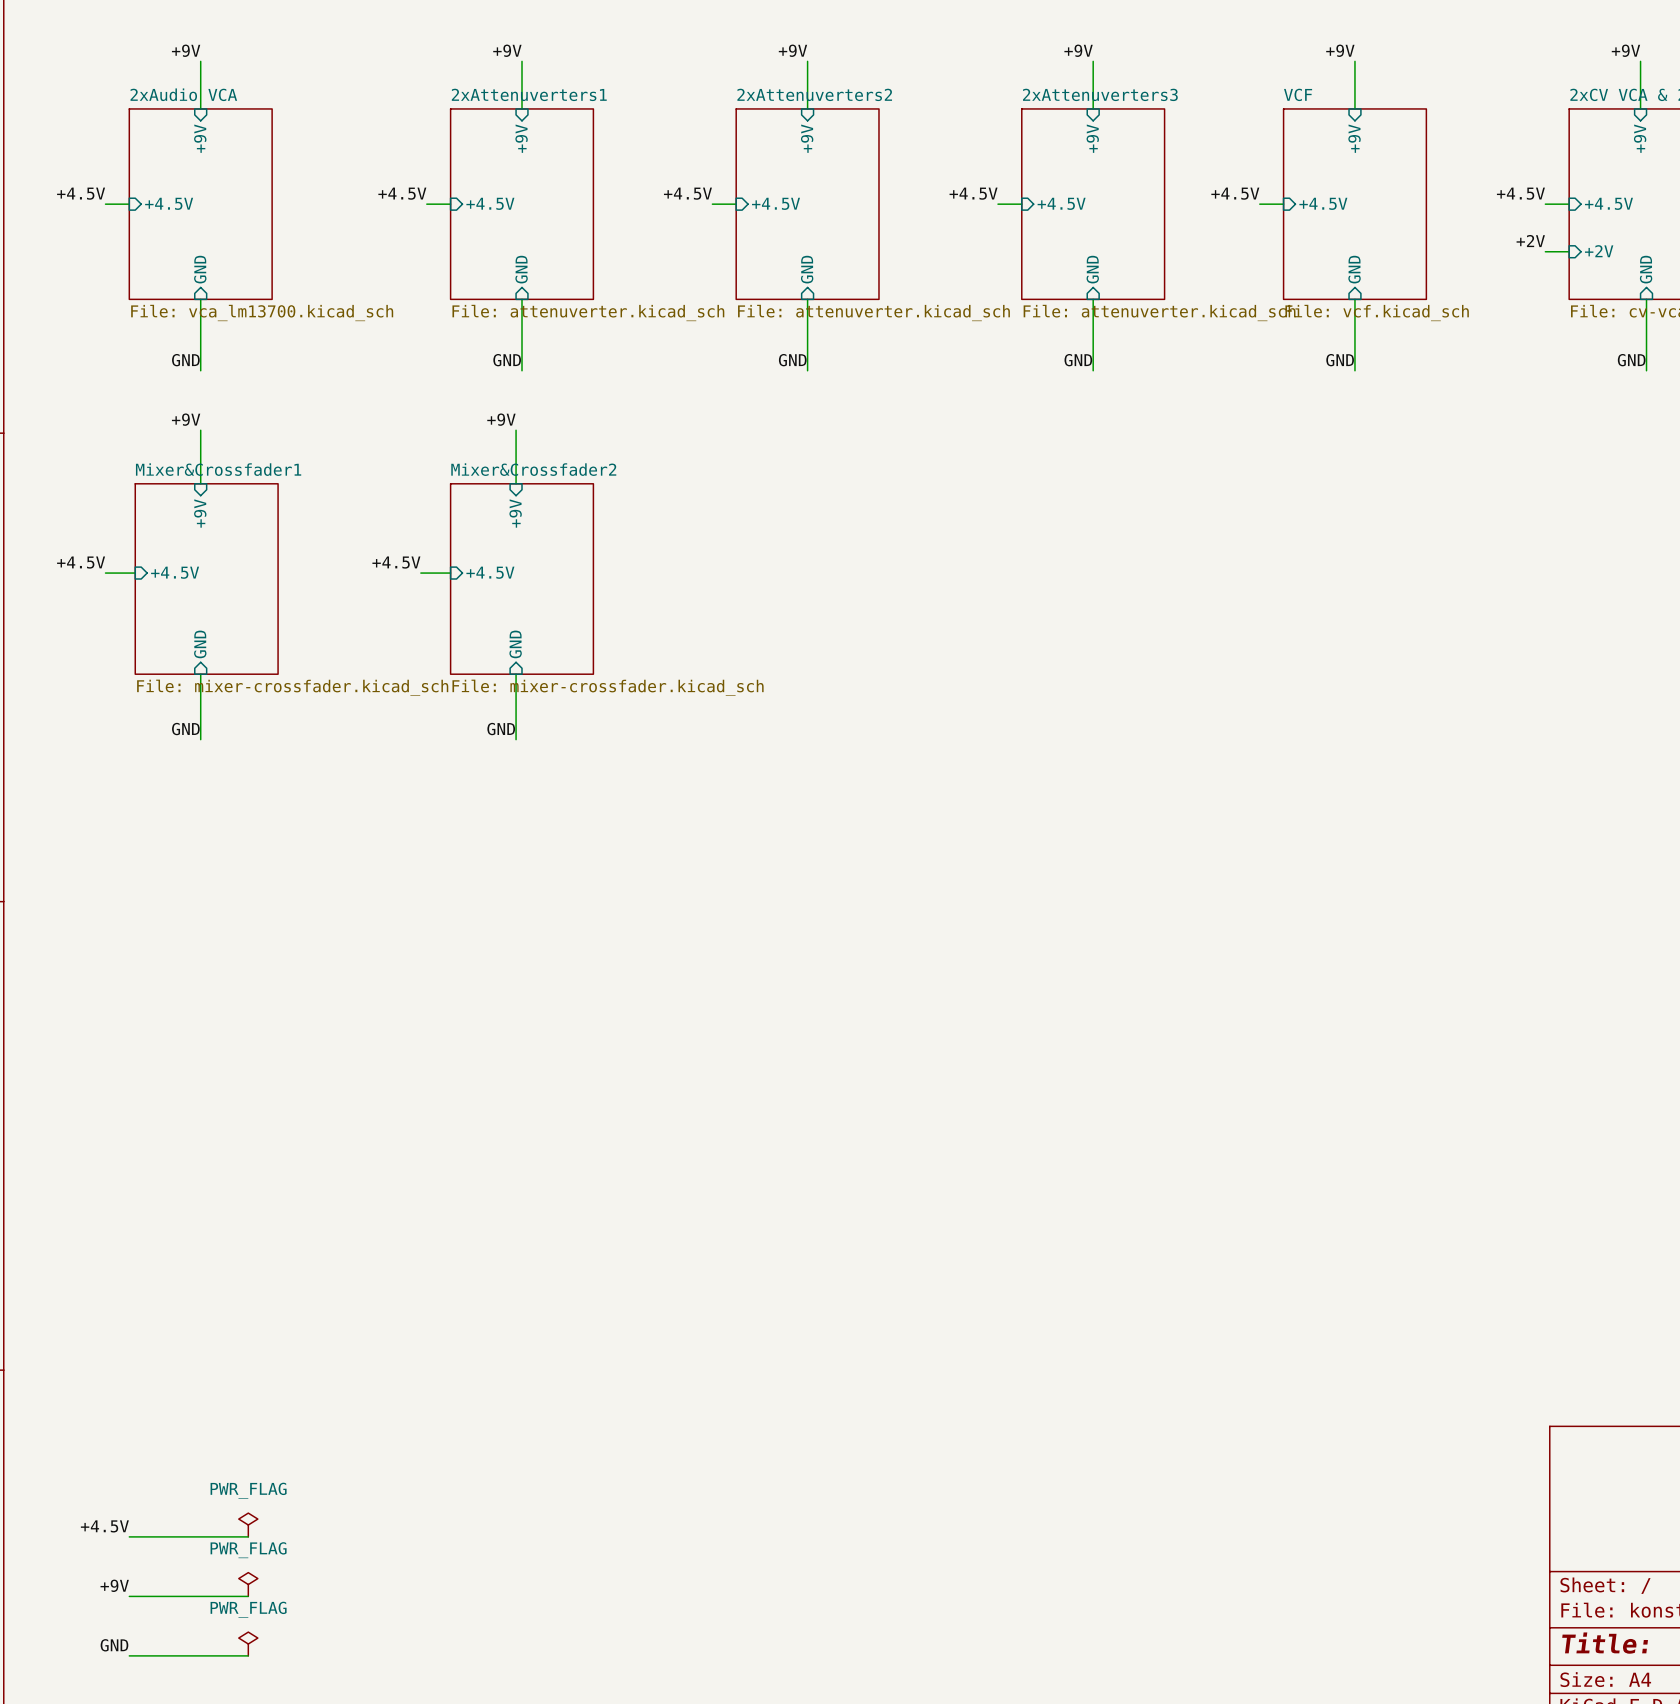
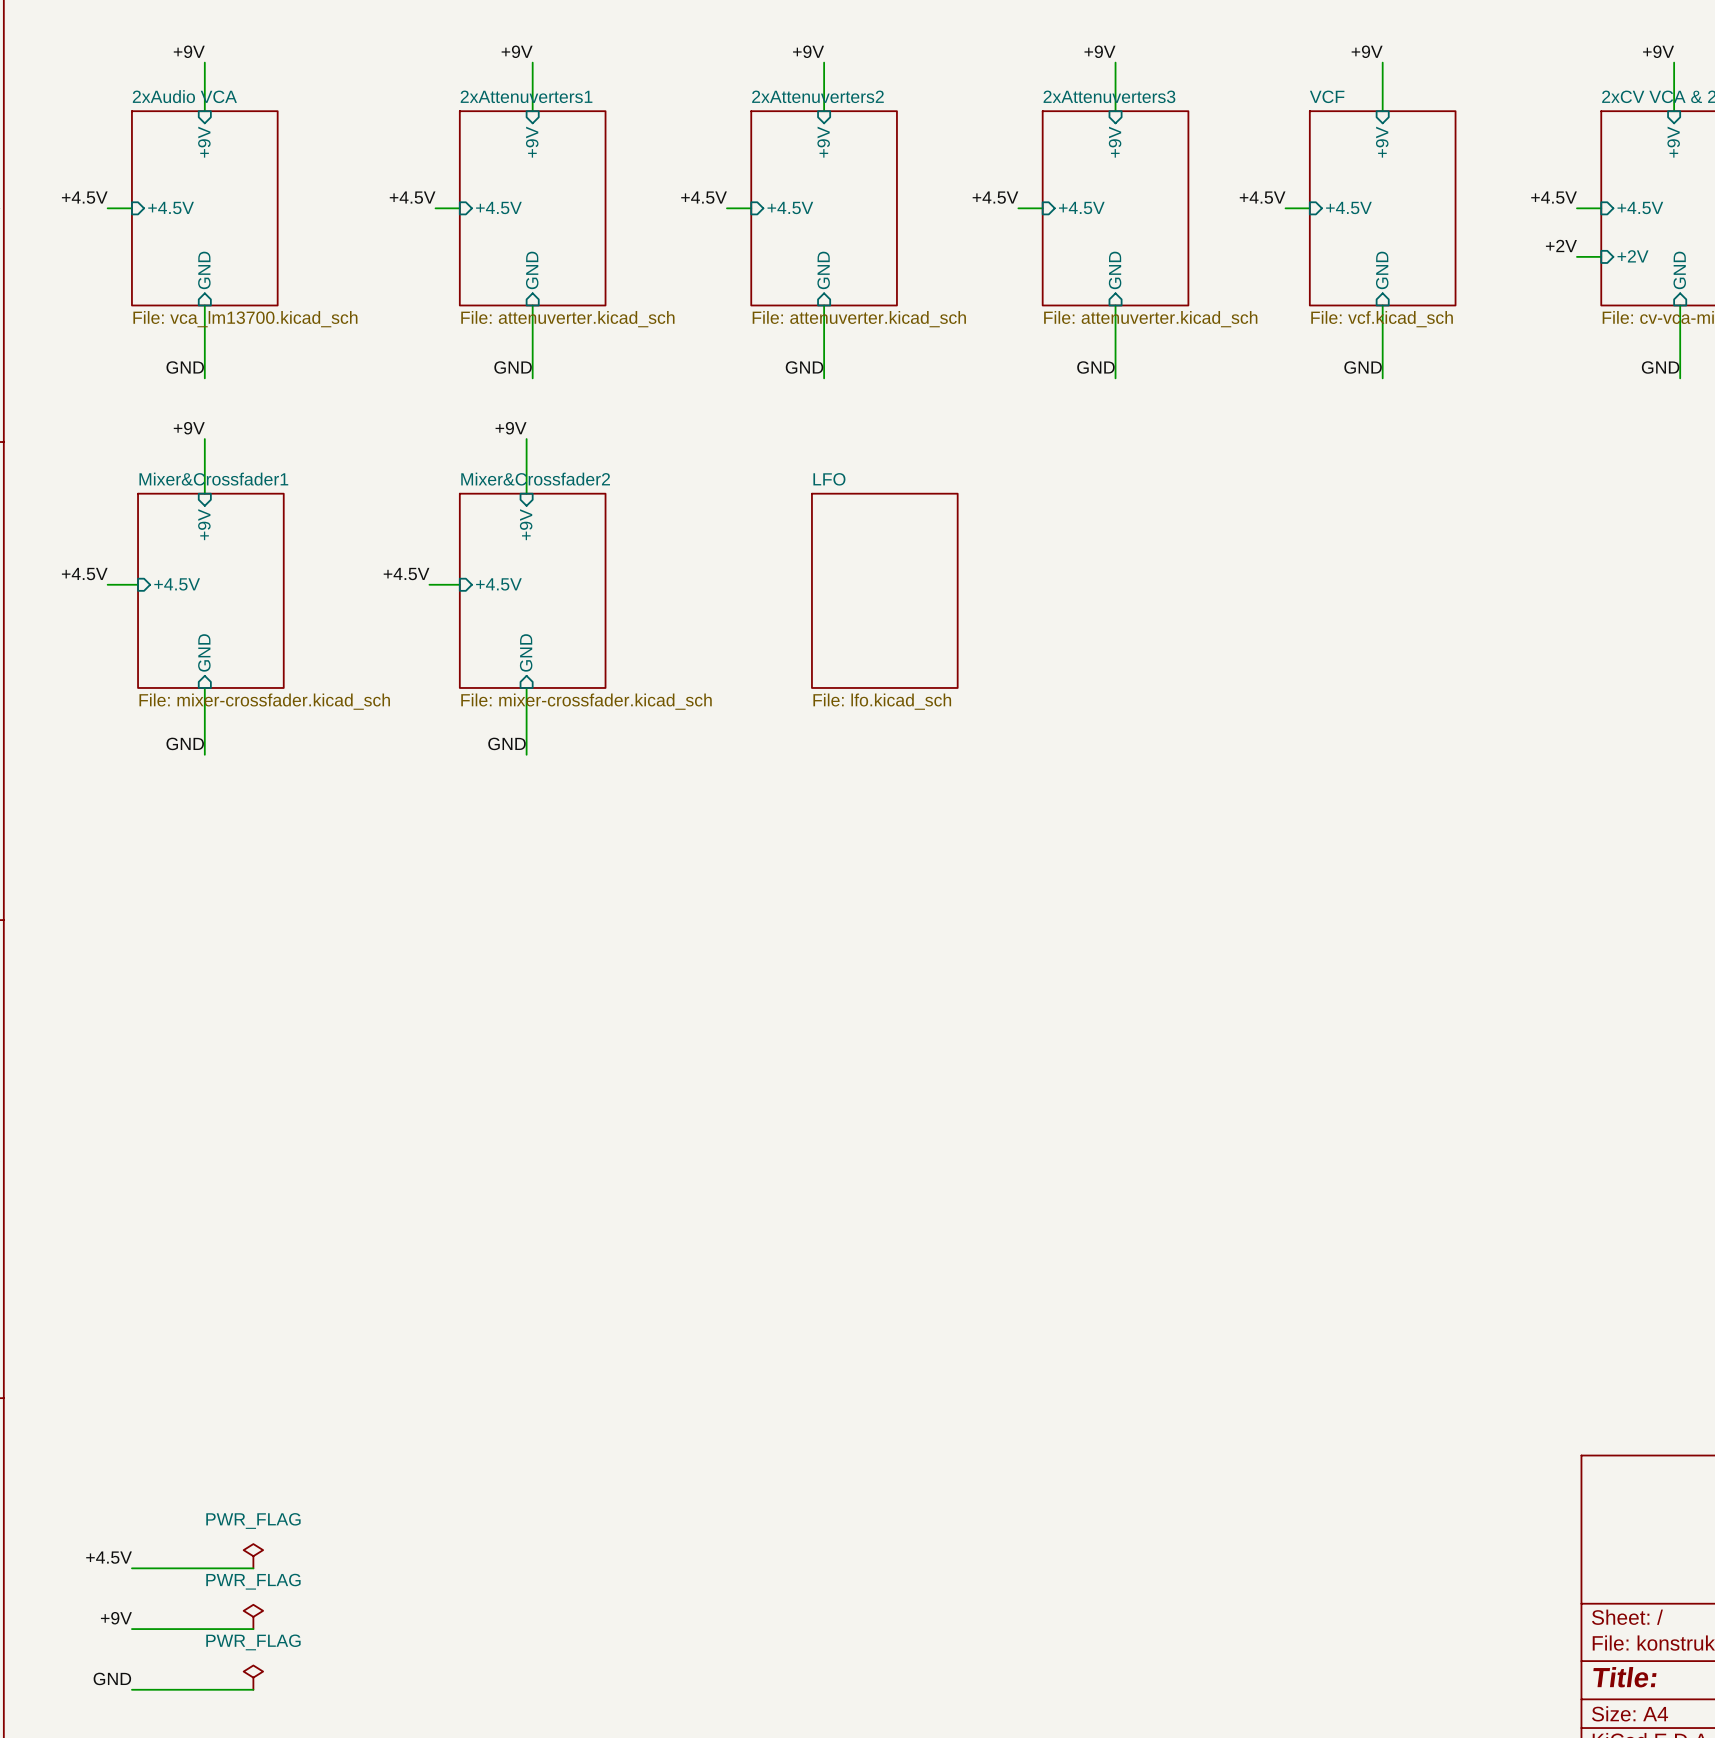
sheet LFO: none -> File: lfo.kicad_sch (884, 590)

